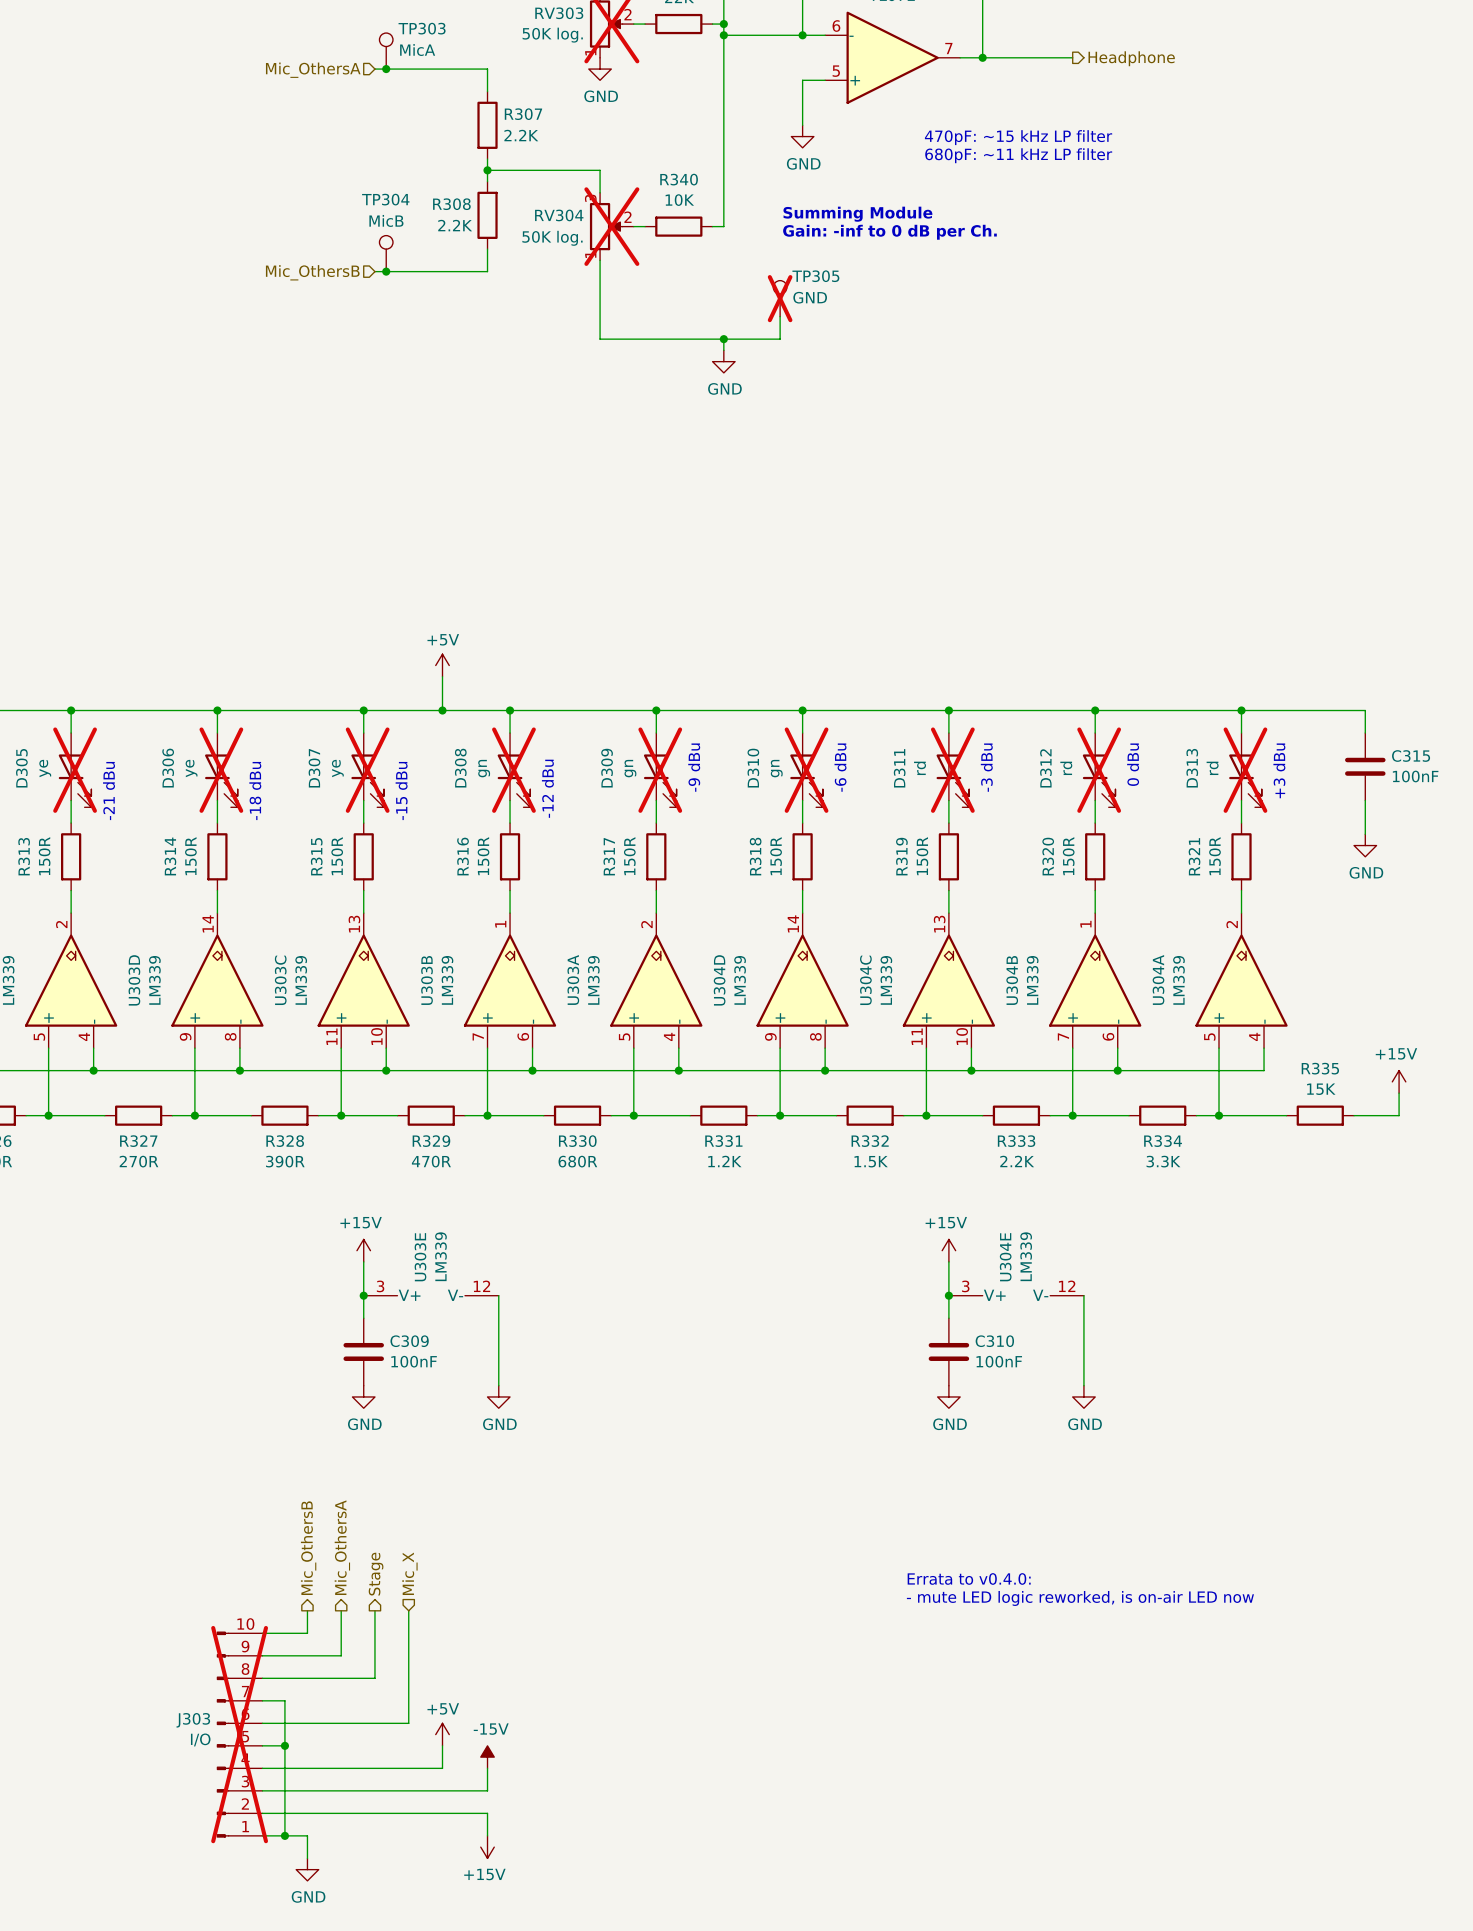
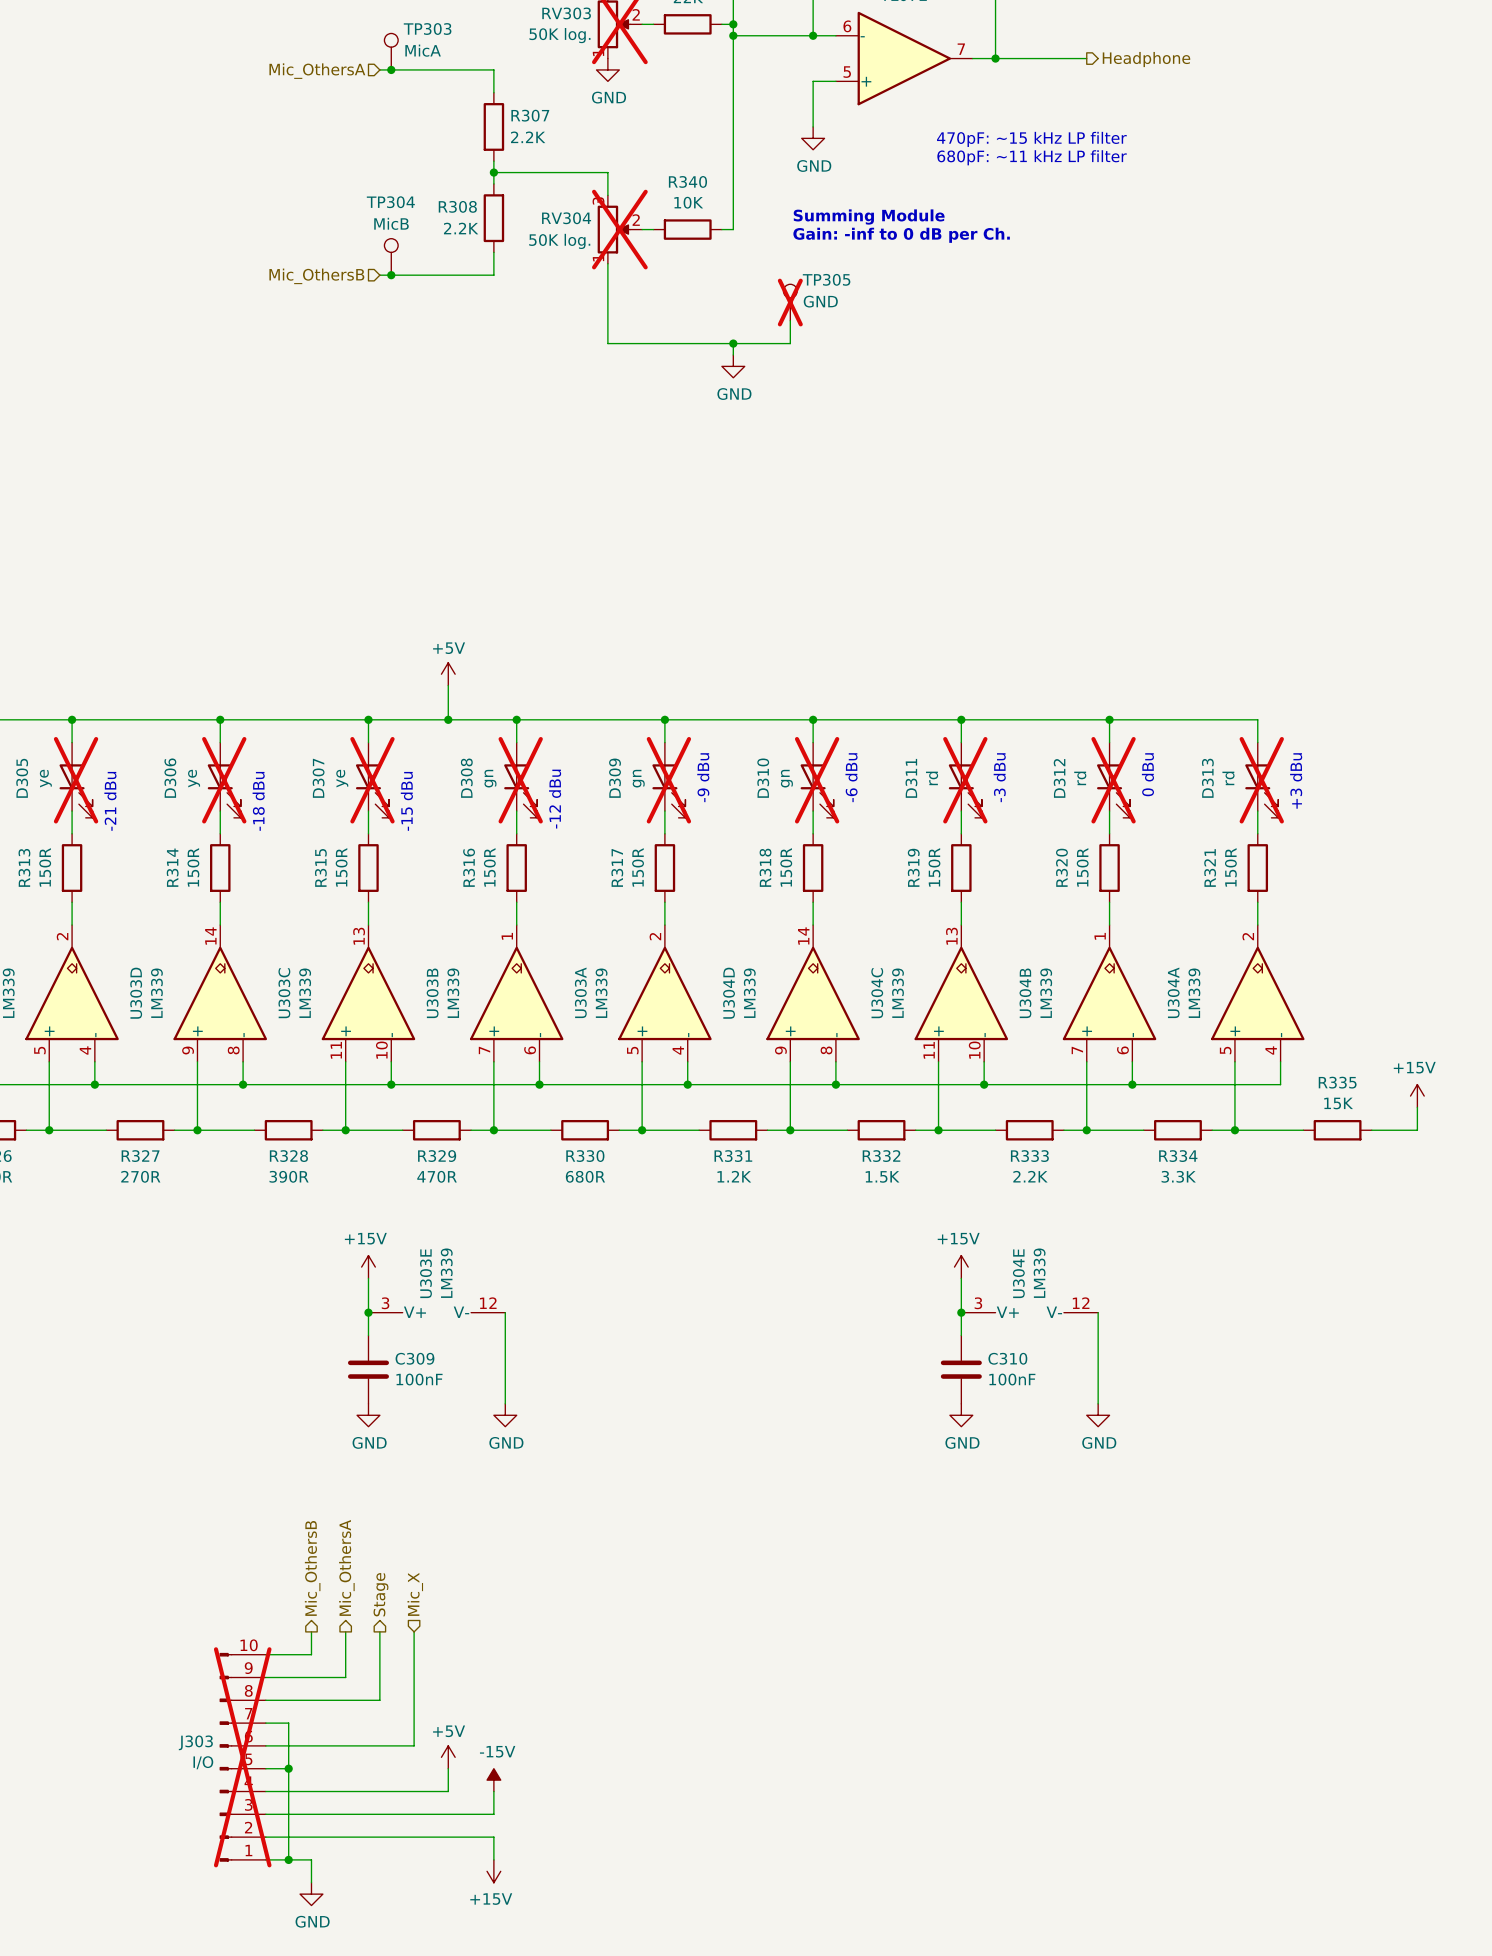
wire: (1241, 710) (1365, 710) (1365, 733) -> none
junction: (1241, 710) -> none
C315: 100nF (1365, 766) -> none
wire: (1365, 800) (1365, 834) -> none
power symbol: GND (1365, 845) -> none
text: Errata to v0.4.0: (969, 1578) -> none
text: - mute LED logic reworked, is on-air LED now (1080, 1598) -> none

